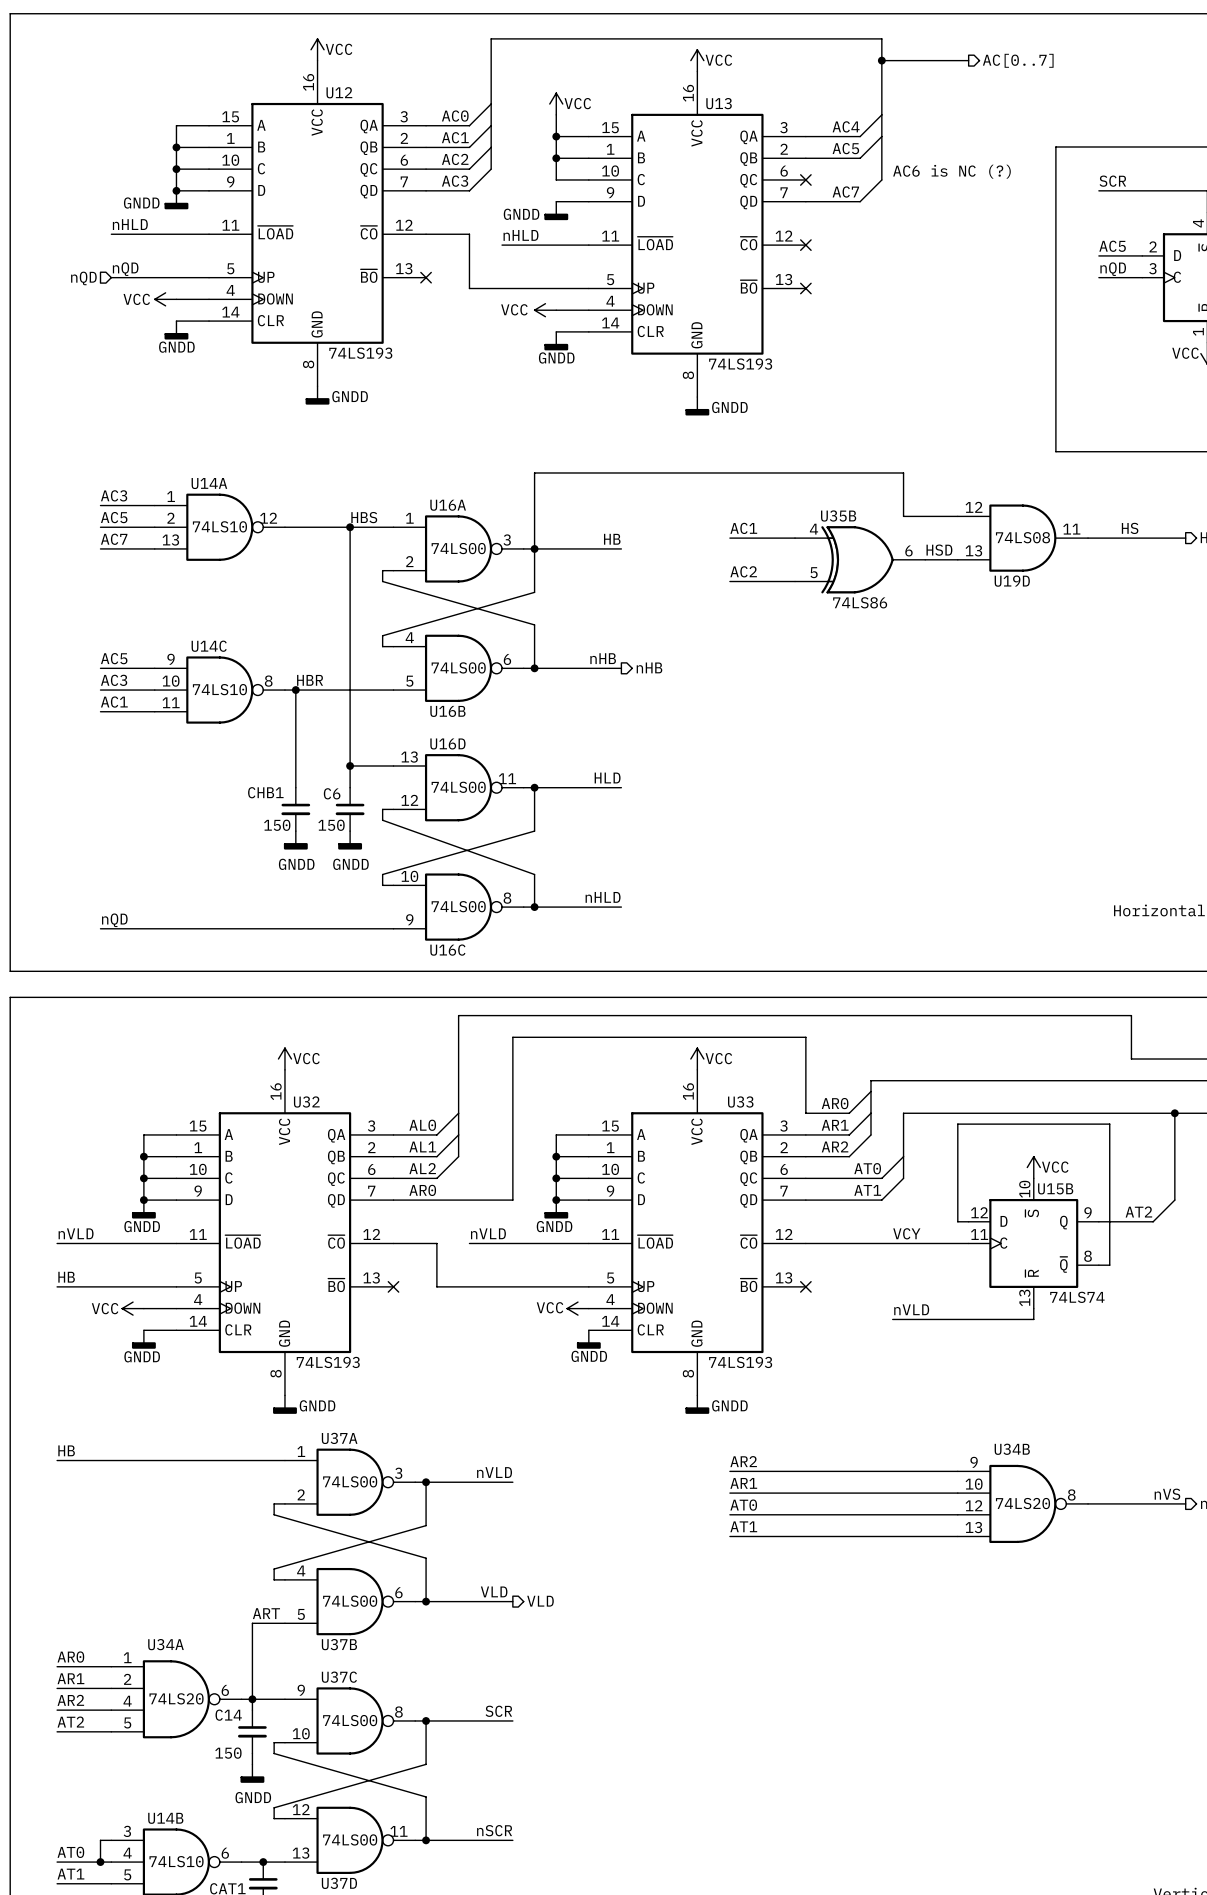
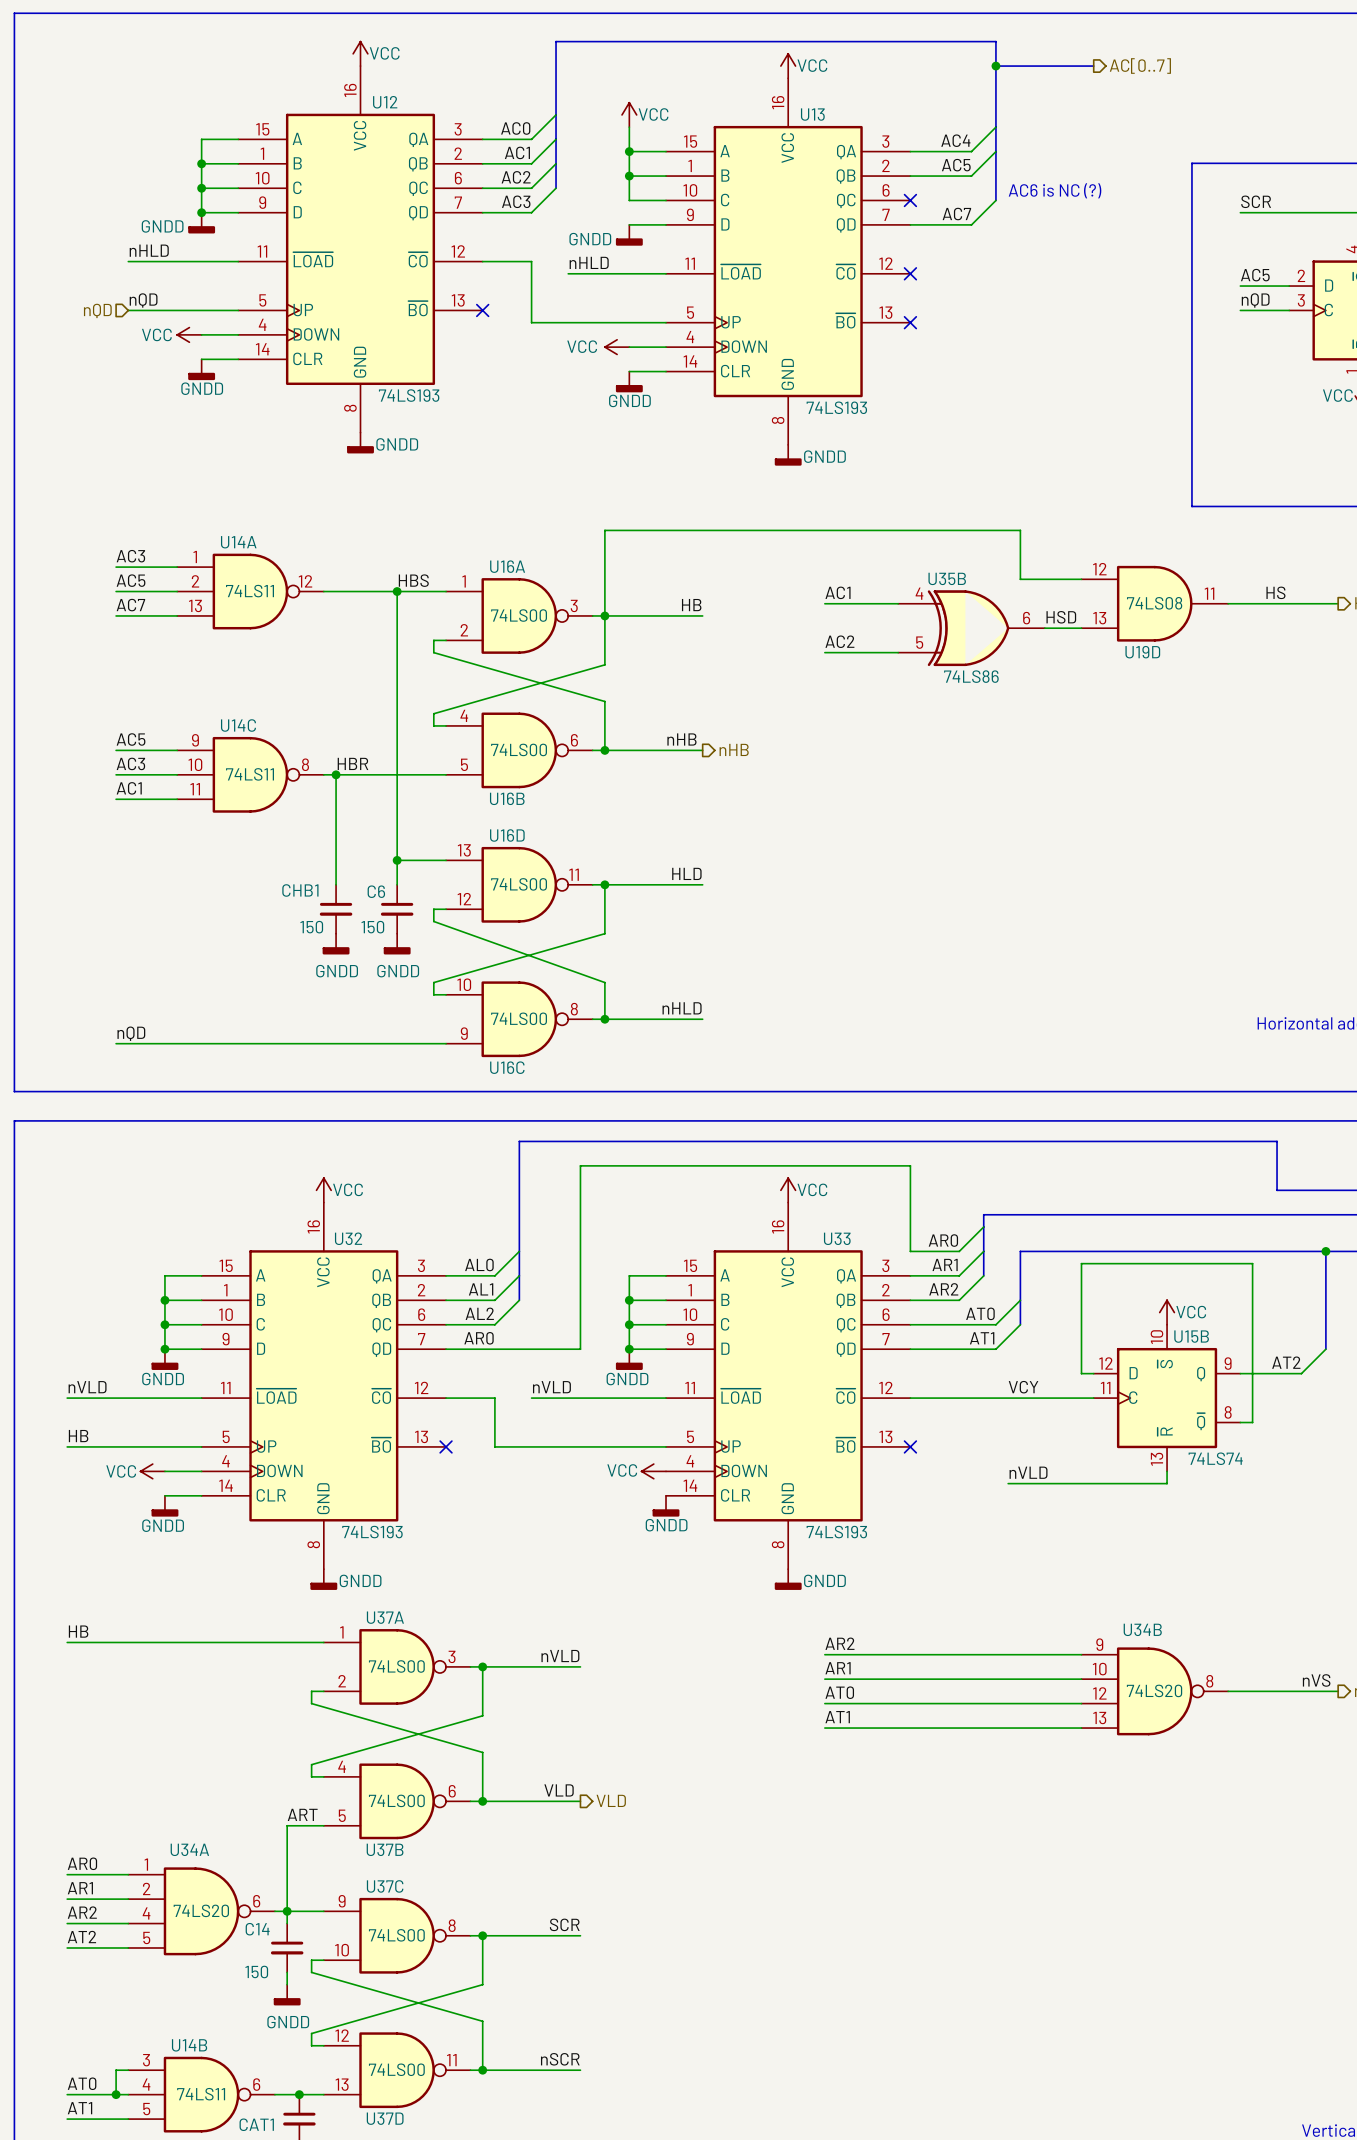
U14A value: 74LS10 (219, 526) -> 74LS11 (250, 591)
U14C value: 74LS10 (219, 689) -> 74LS11 (250, 774)
U14B value: 74LS10 (176, 1861) -> 74LS11 (201, 2094)

